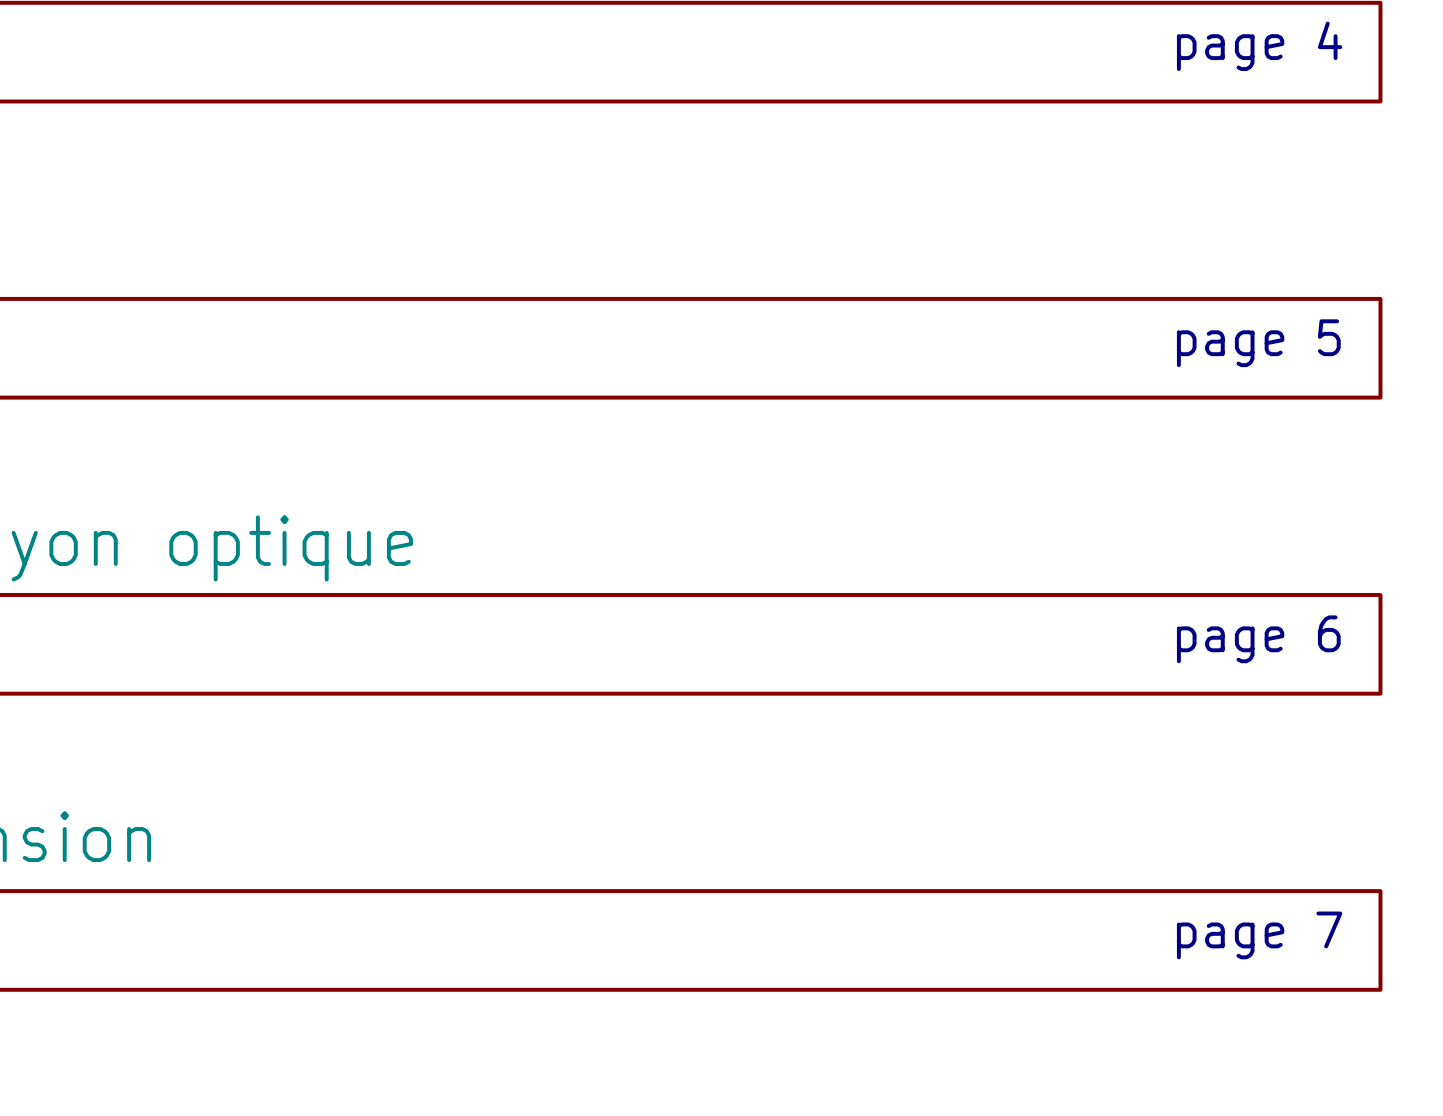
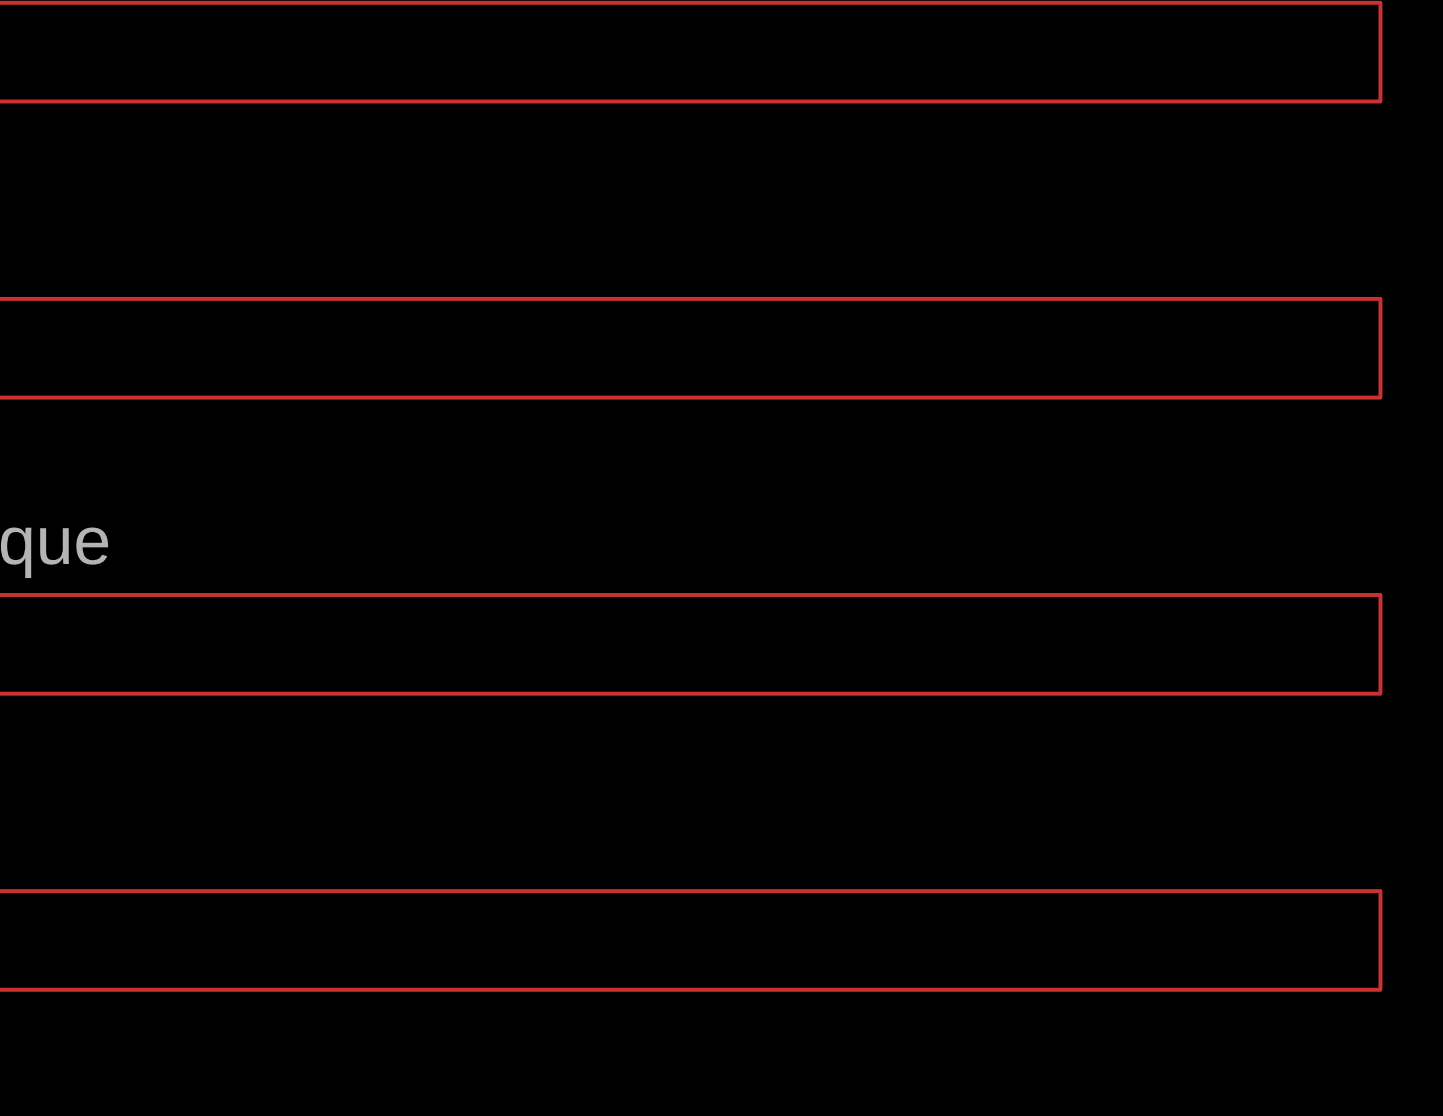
text: page 4 (1259, 46) -> none
text: page 5 (1258, 343) -> none
text: page 6 (1258, 639) -> none
text: page 7 (1259, 935) -> none

